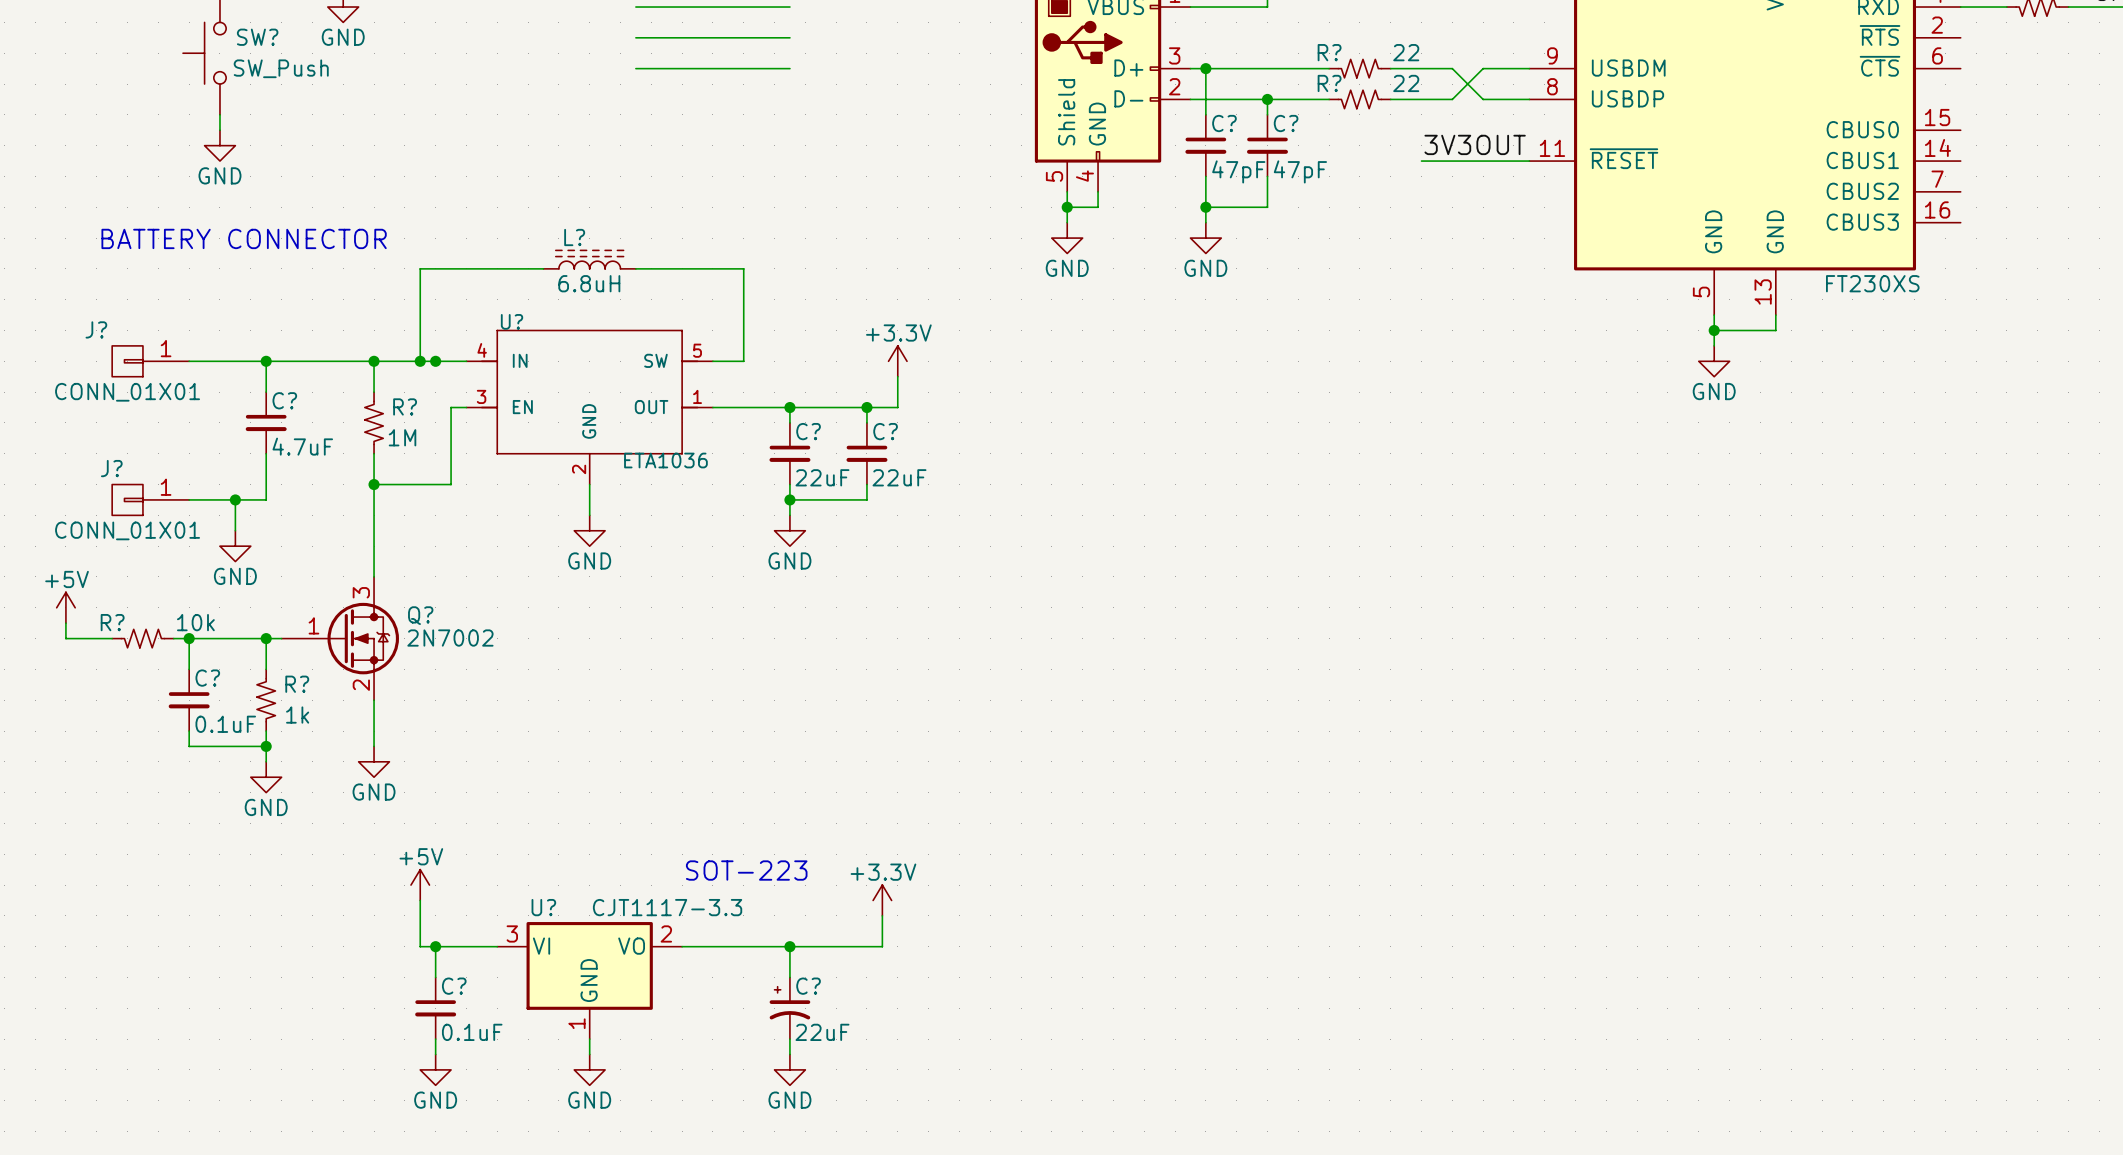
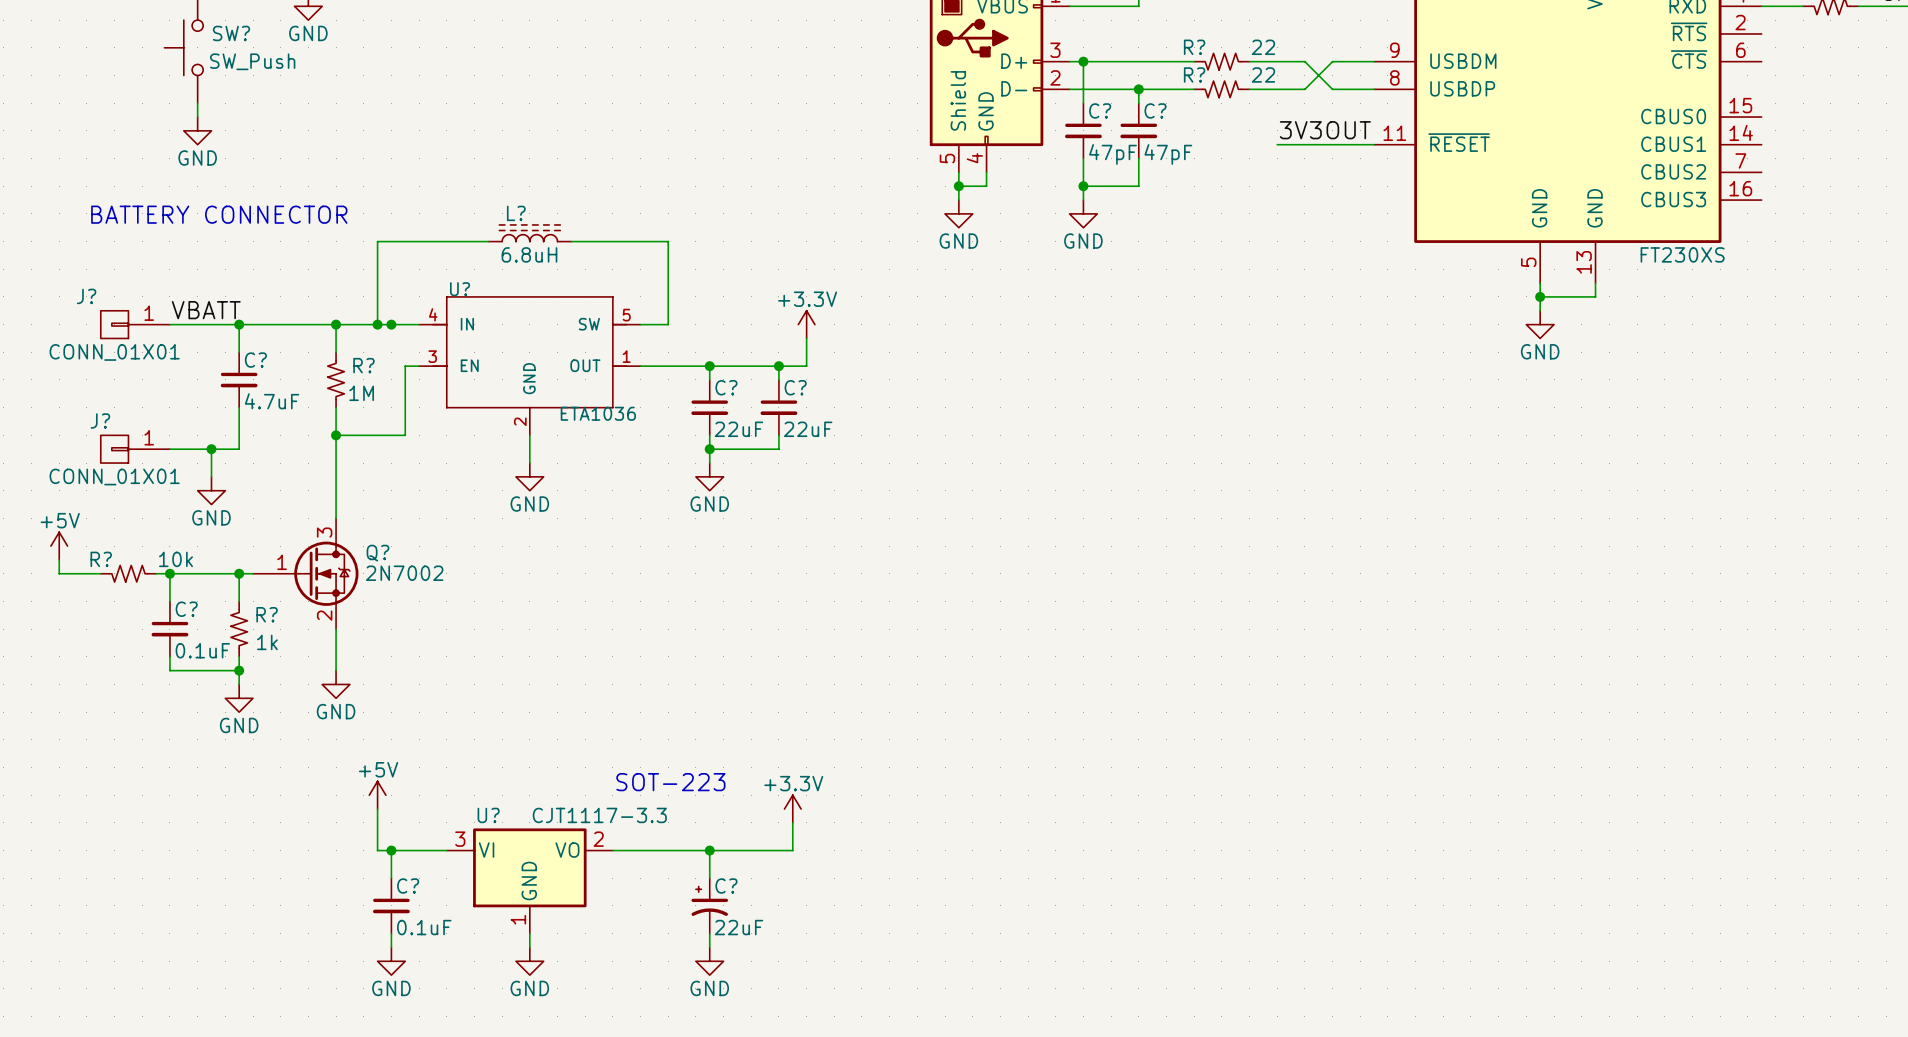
wire: (635, 7) (789, 7) -> none
wire: (635, 37) (789, 37) -> none
wire: (635, 68) (789, 68) -> none
label: none -> VBATT (206, 310)

